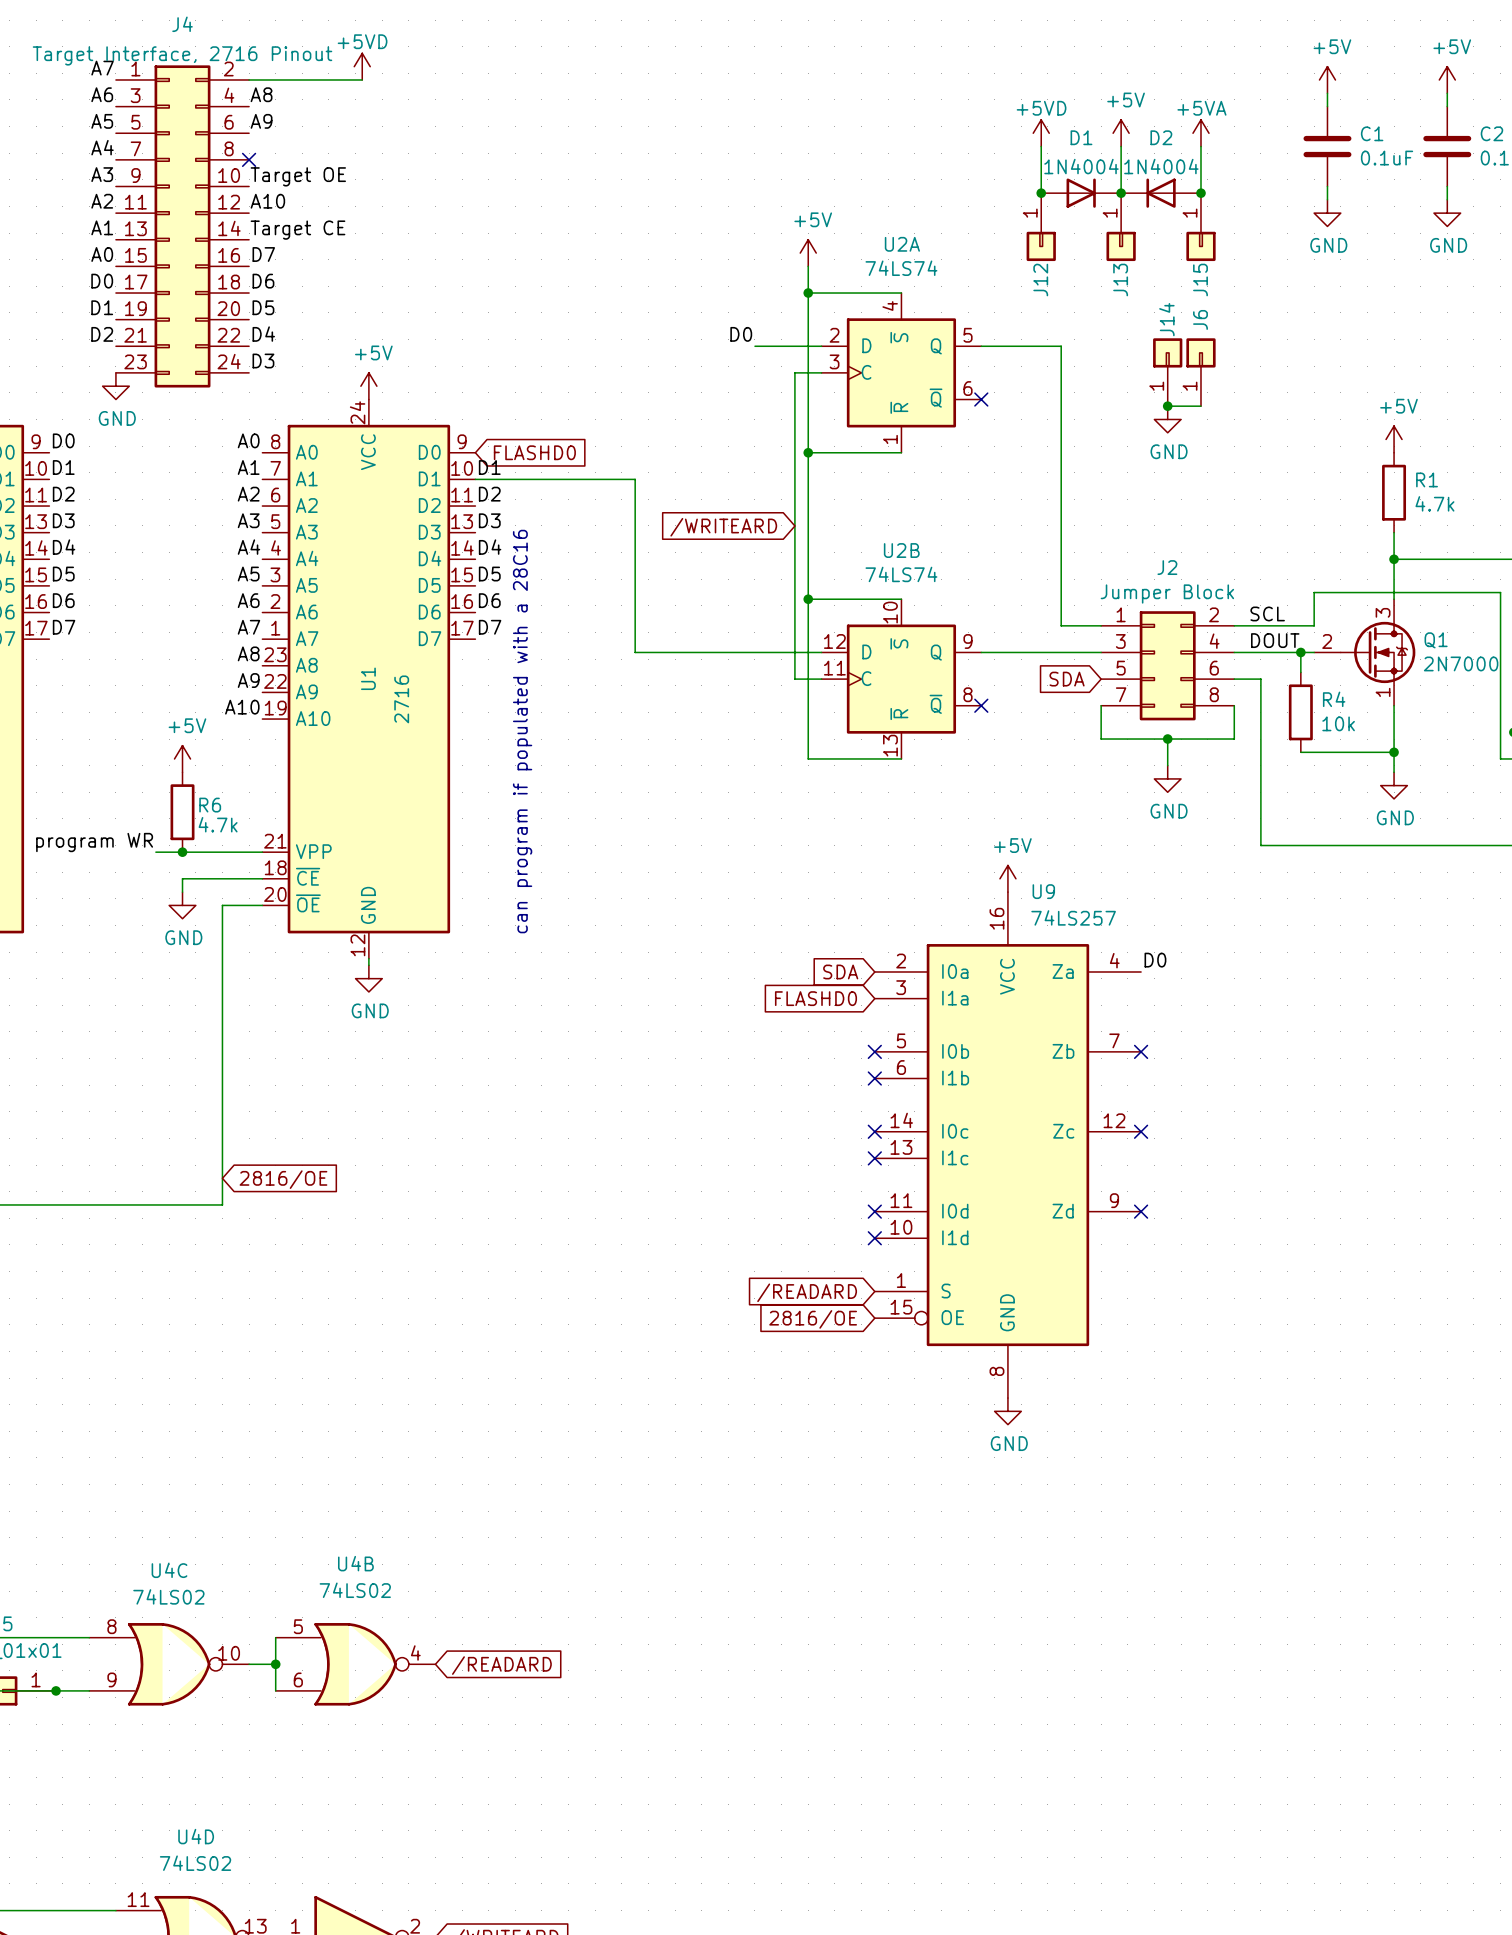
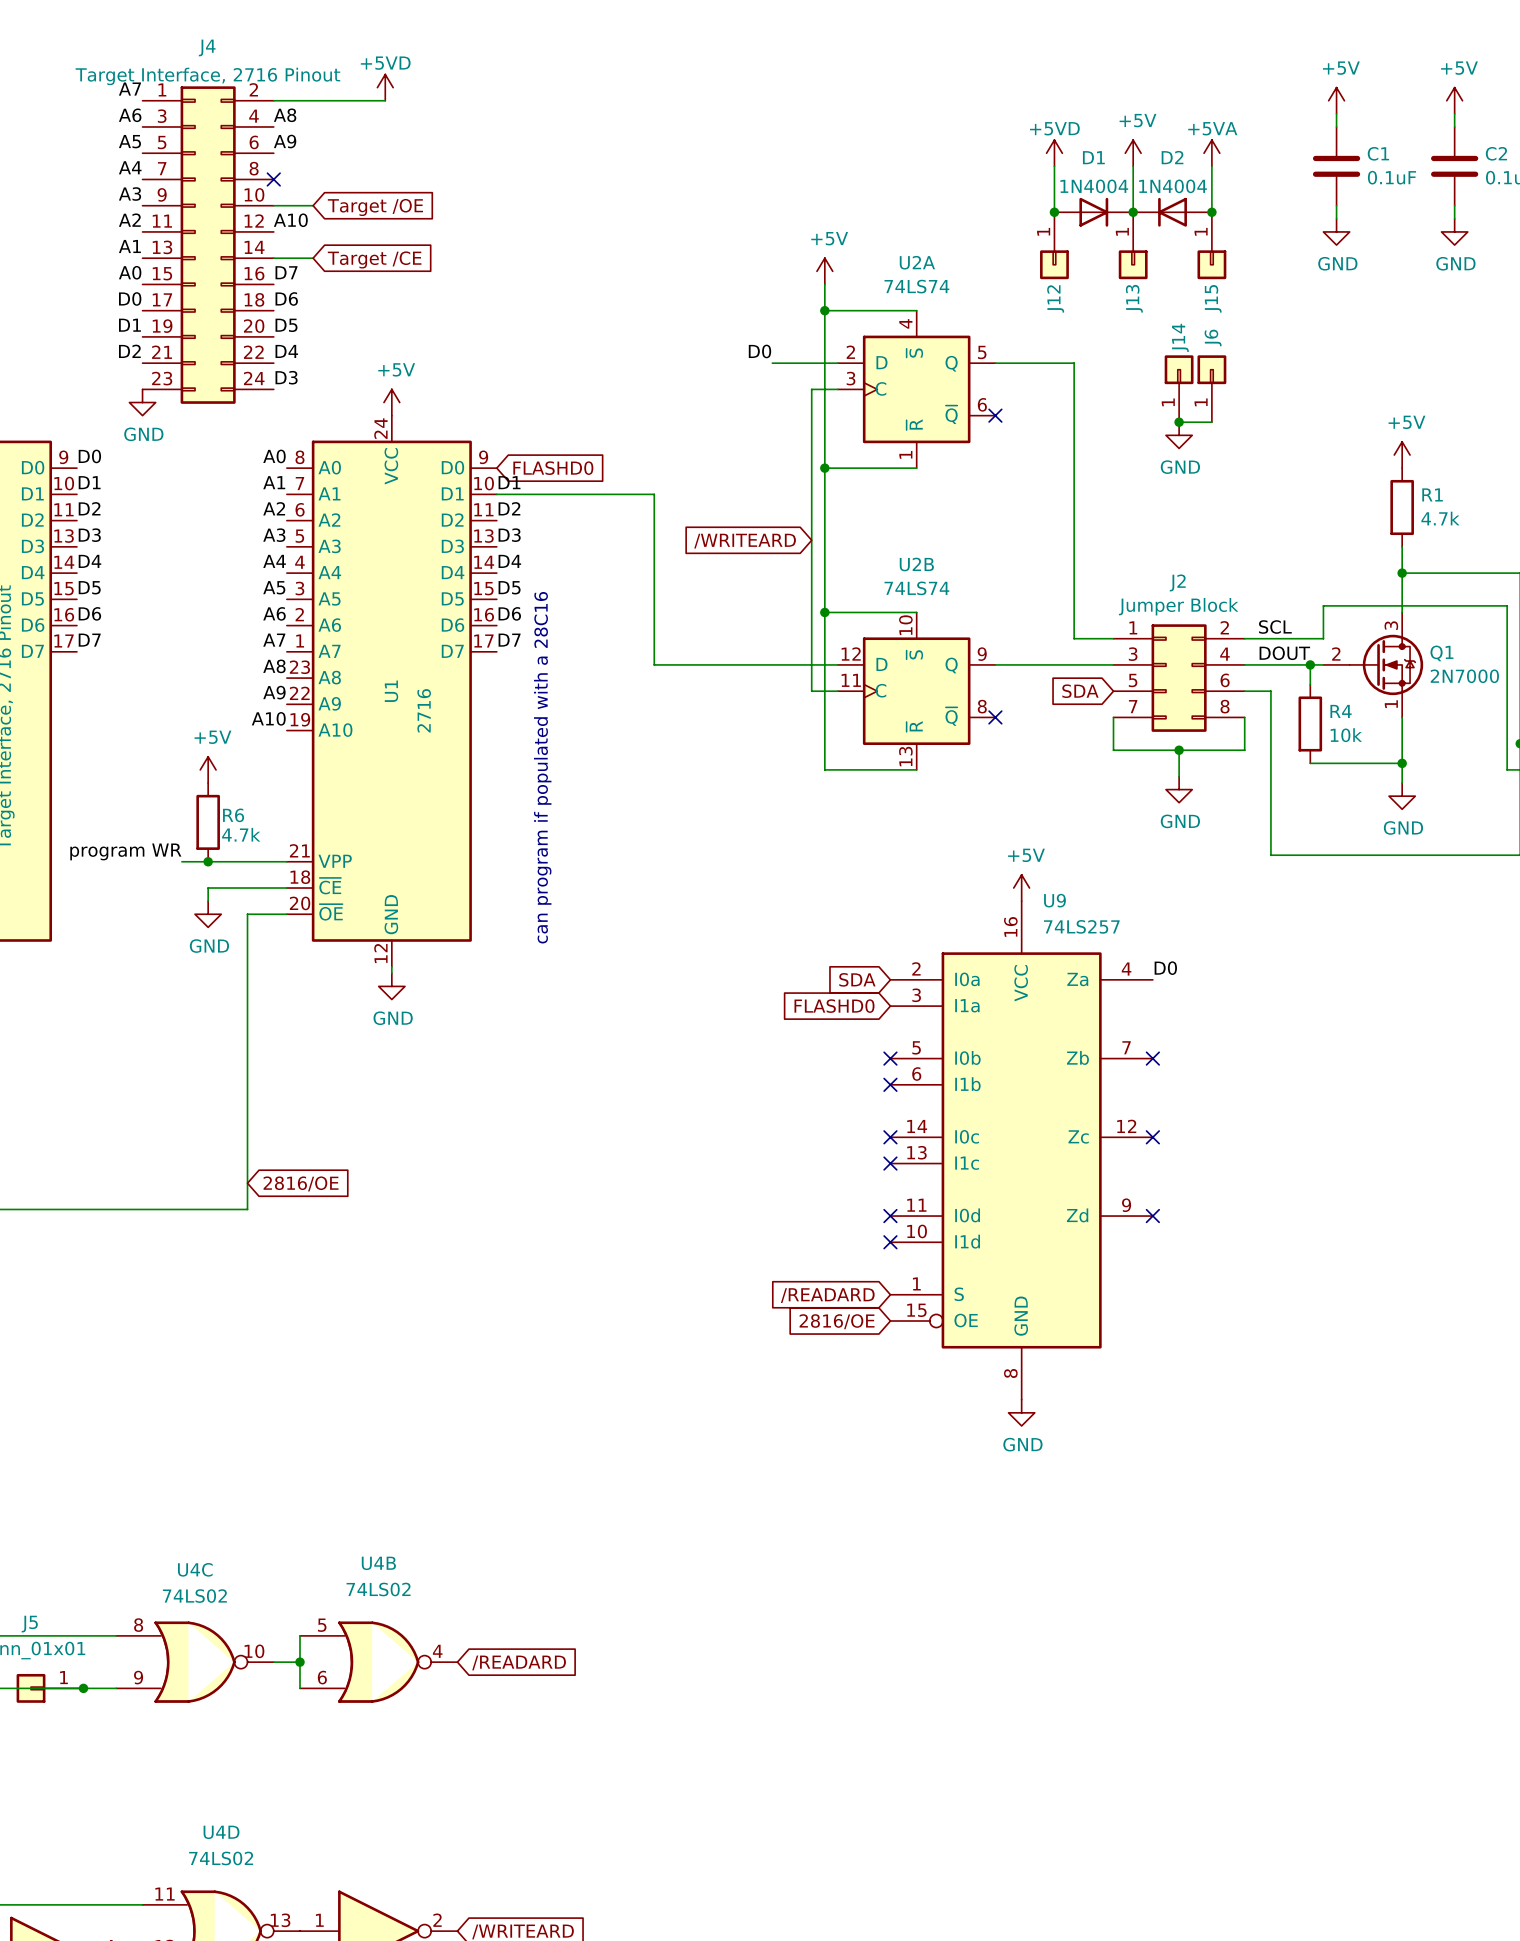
label: Target OE (298, 176) -> none
wire: none -> (273, 205) (313, 205)
global label: none -> Target /OE (375, 207)
label: Target CE (297, 230) -> none
wire: none -> (273, 258) (313, 258)
global label: none -> Target /CE (374, 259)

